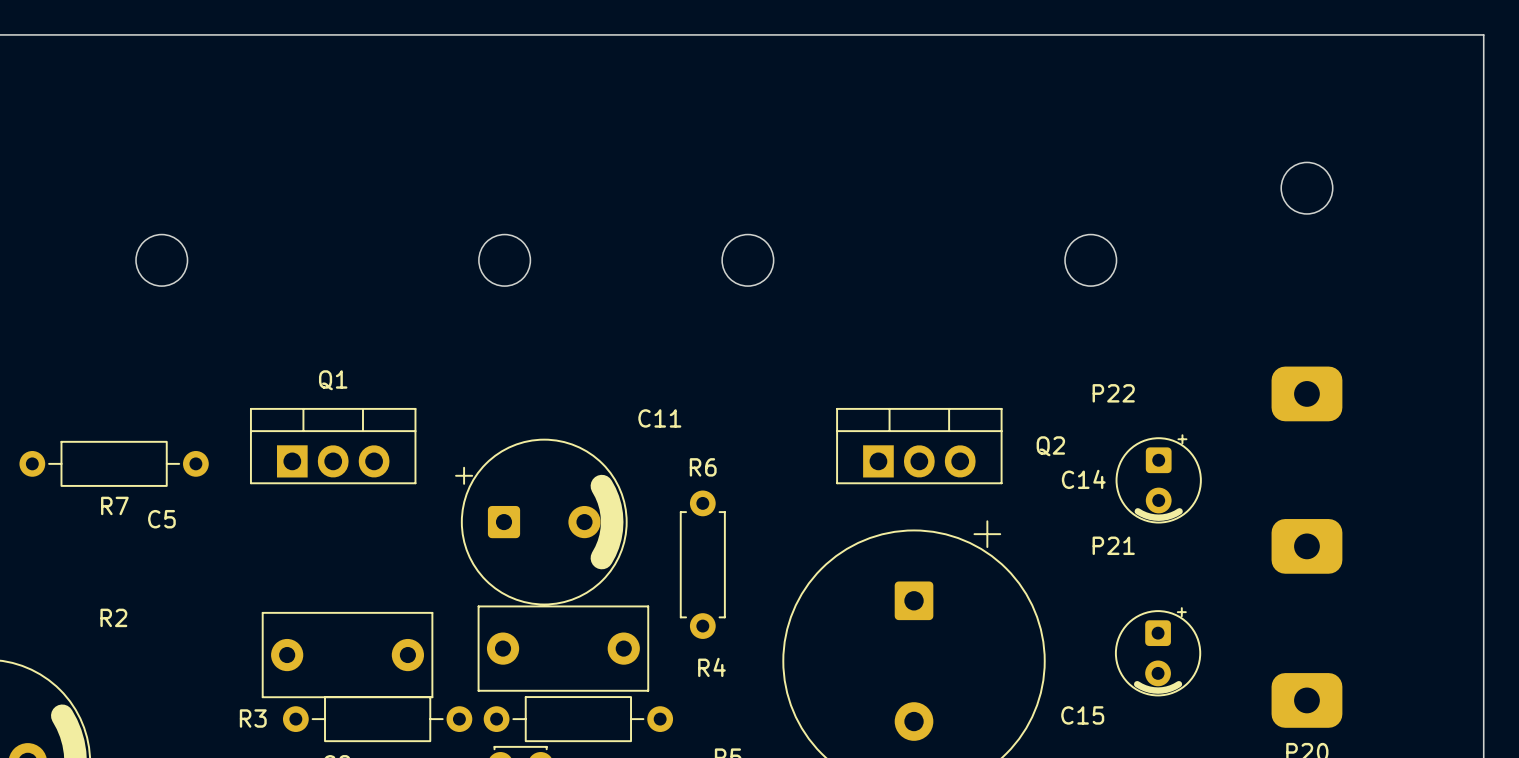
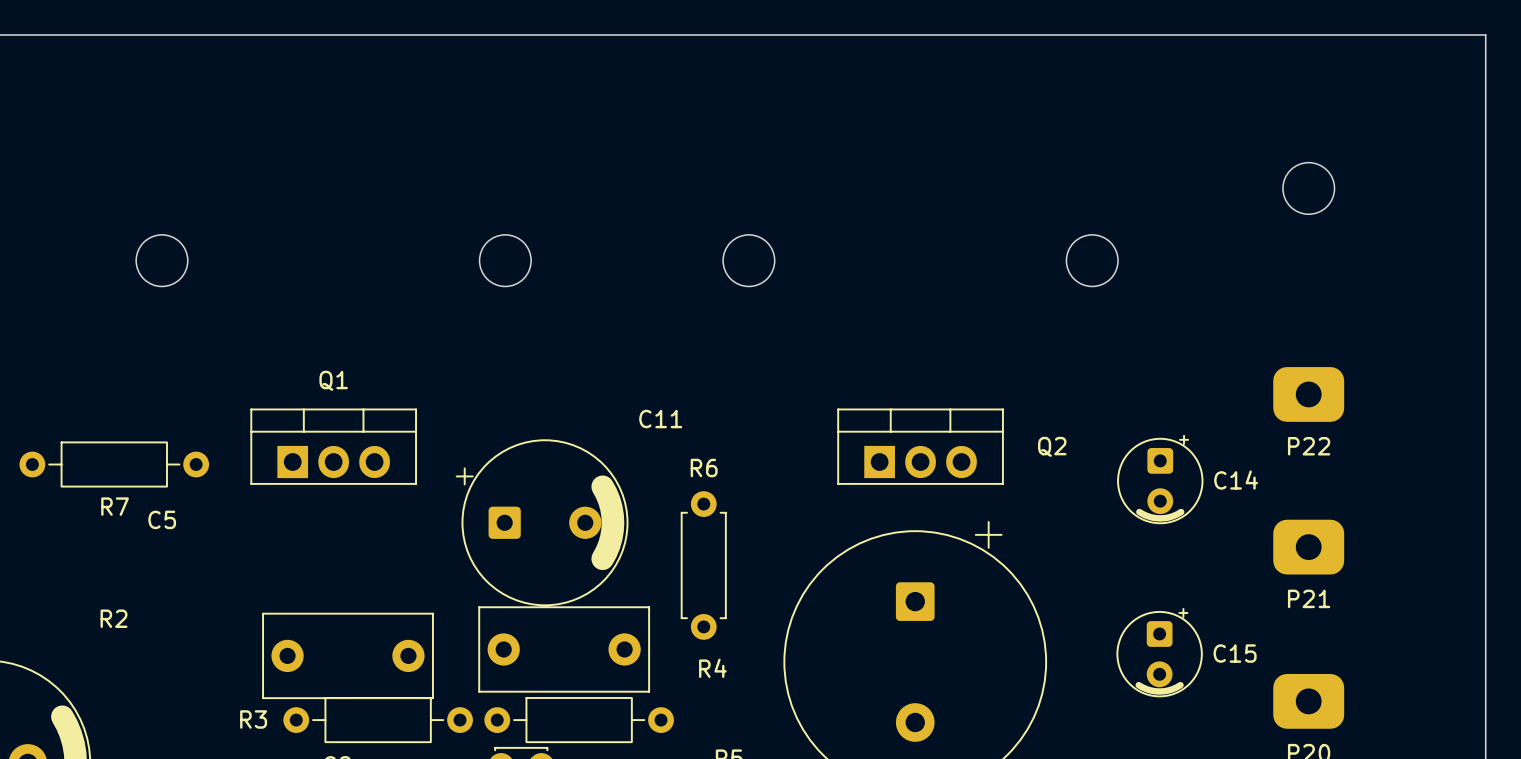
P22 name position: P22 (1113, 393) -> P22 (1309, 446)
C14 name position: C14 (1083, 479) -> C14 (1236, 480)
P21 name position: P21 (1113, 545) -> P21 (1309, 598)
C15 name position: C15 (1082, 715) -> C15 (1235, 653)

